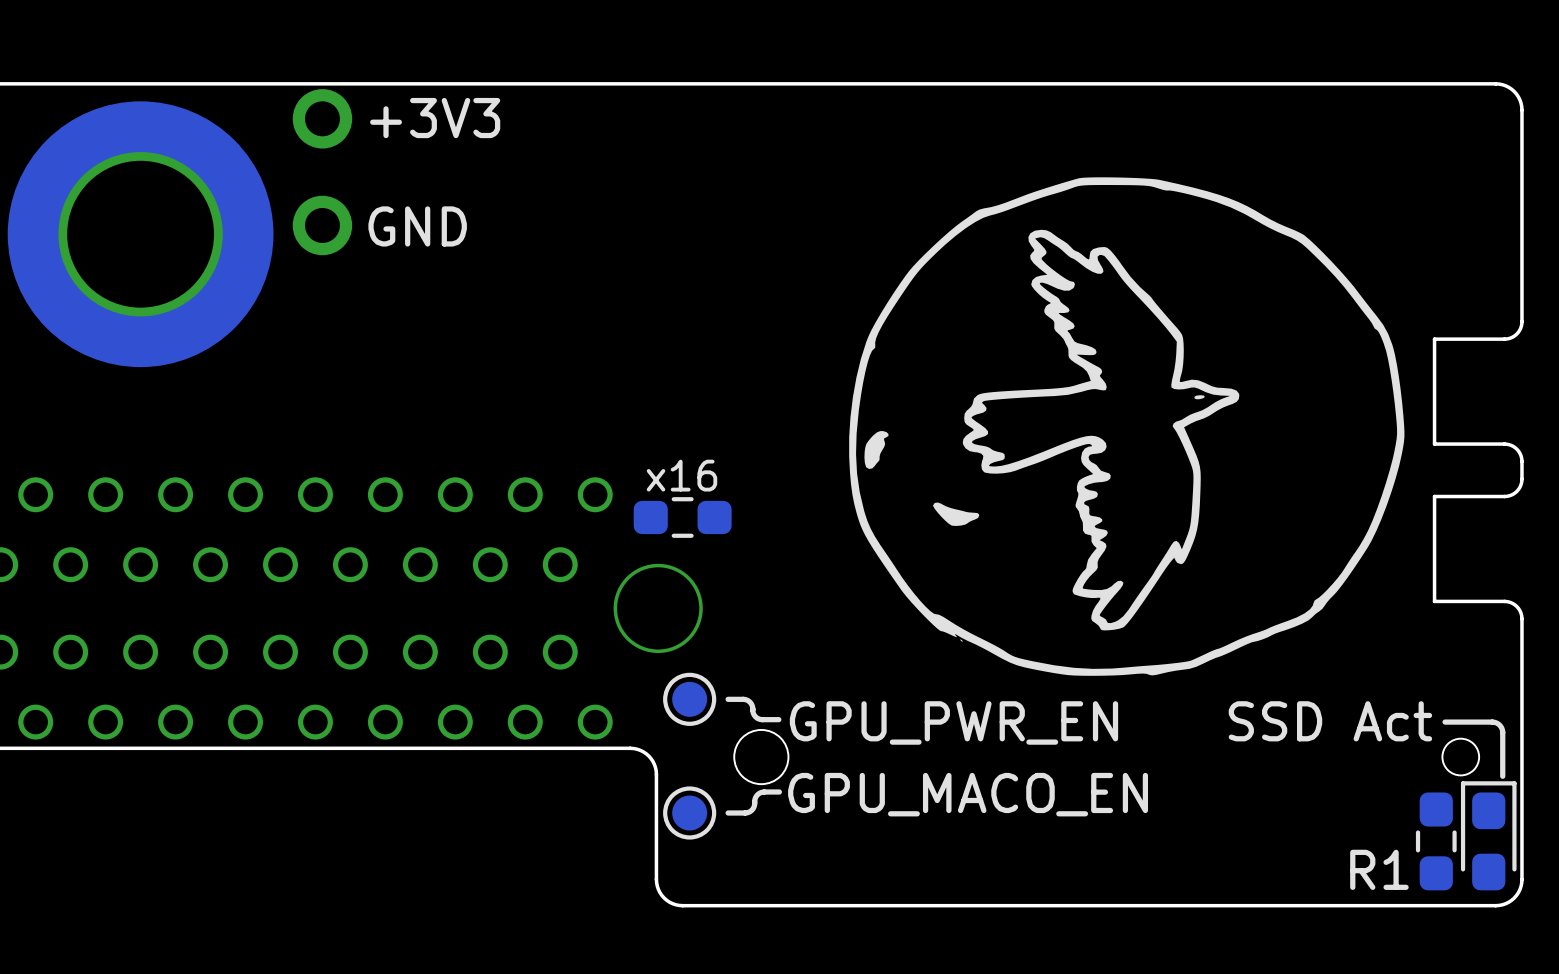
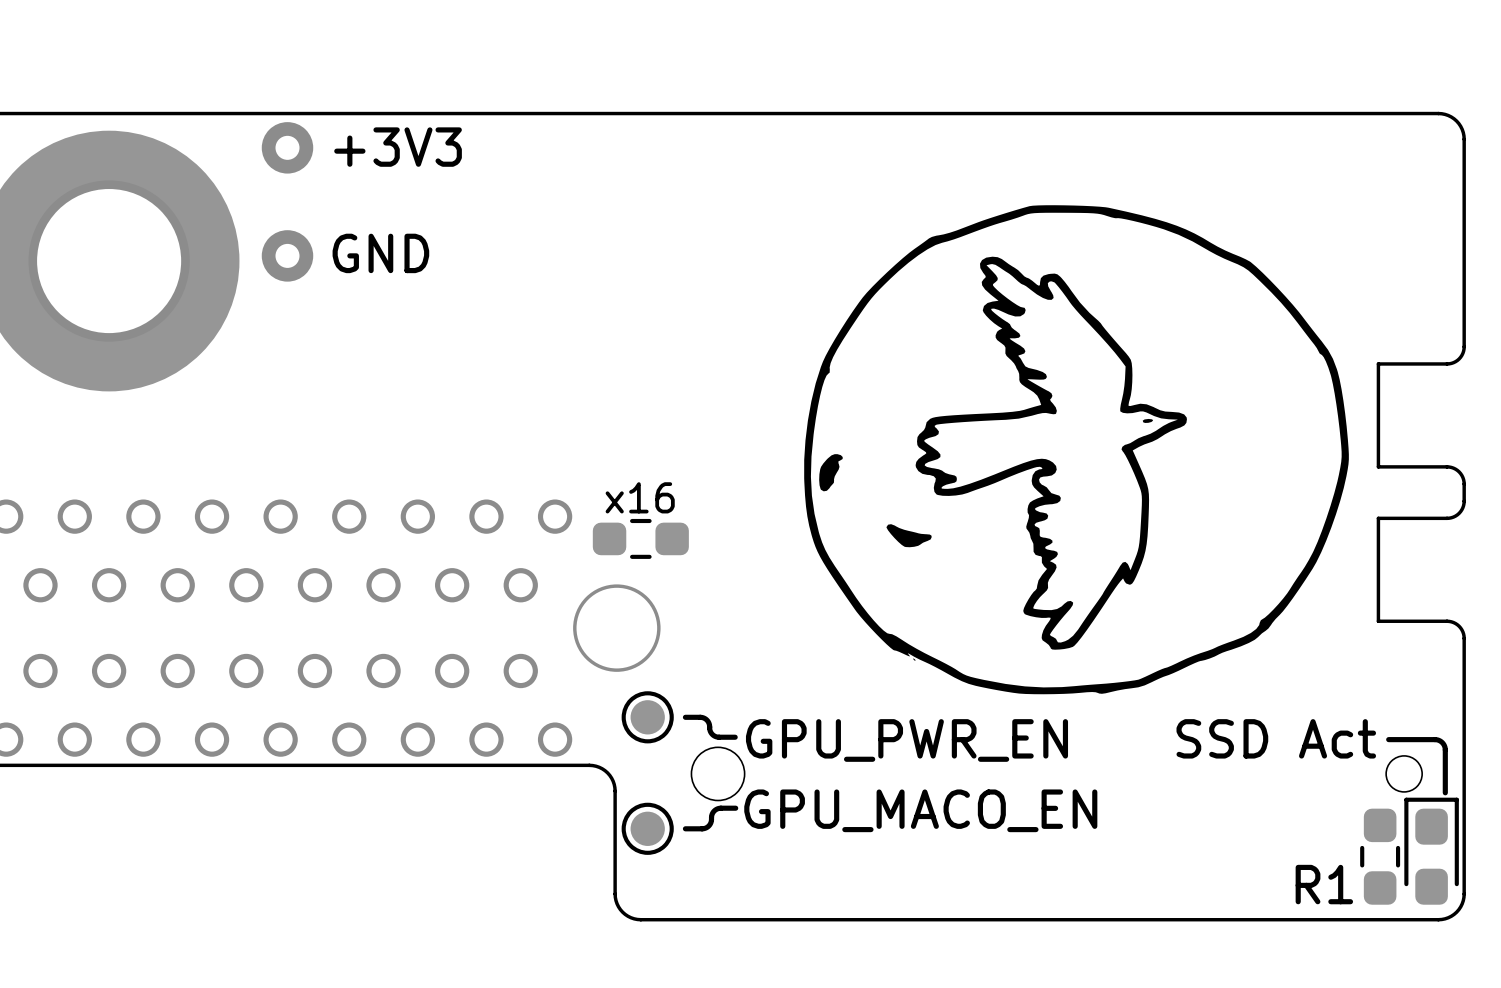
part footprint: [292, 89, 353, 149] -> [261, 122, 314, 174]
part footprint: [292, 195, 353, 256] -> [261, 230, 314, 282]

